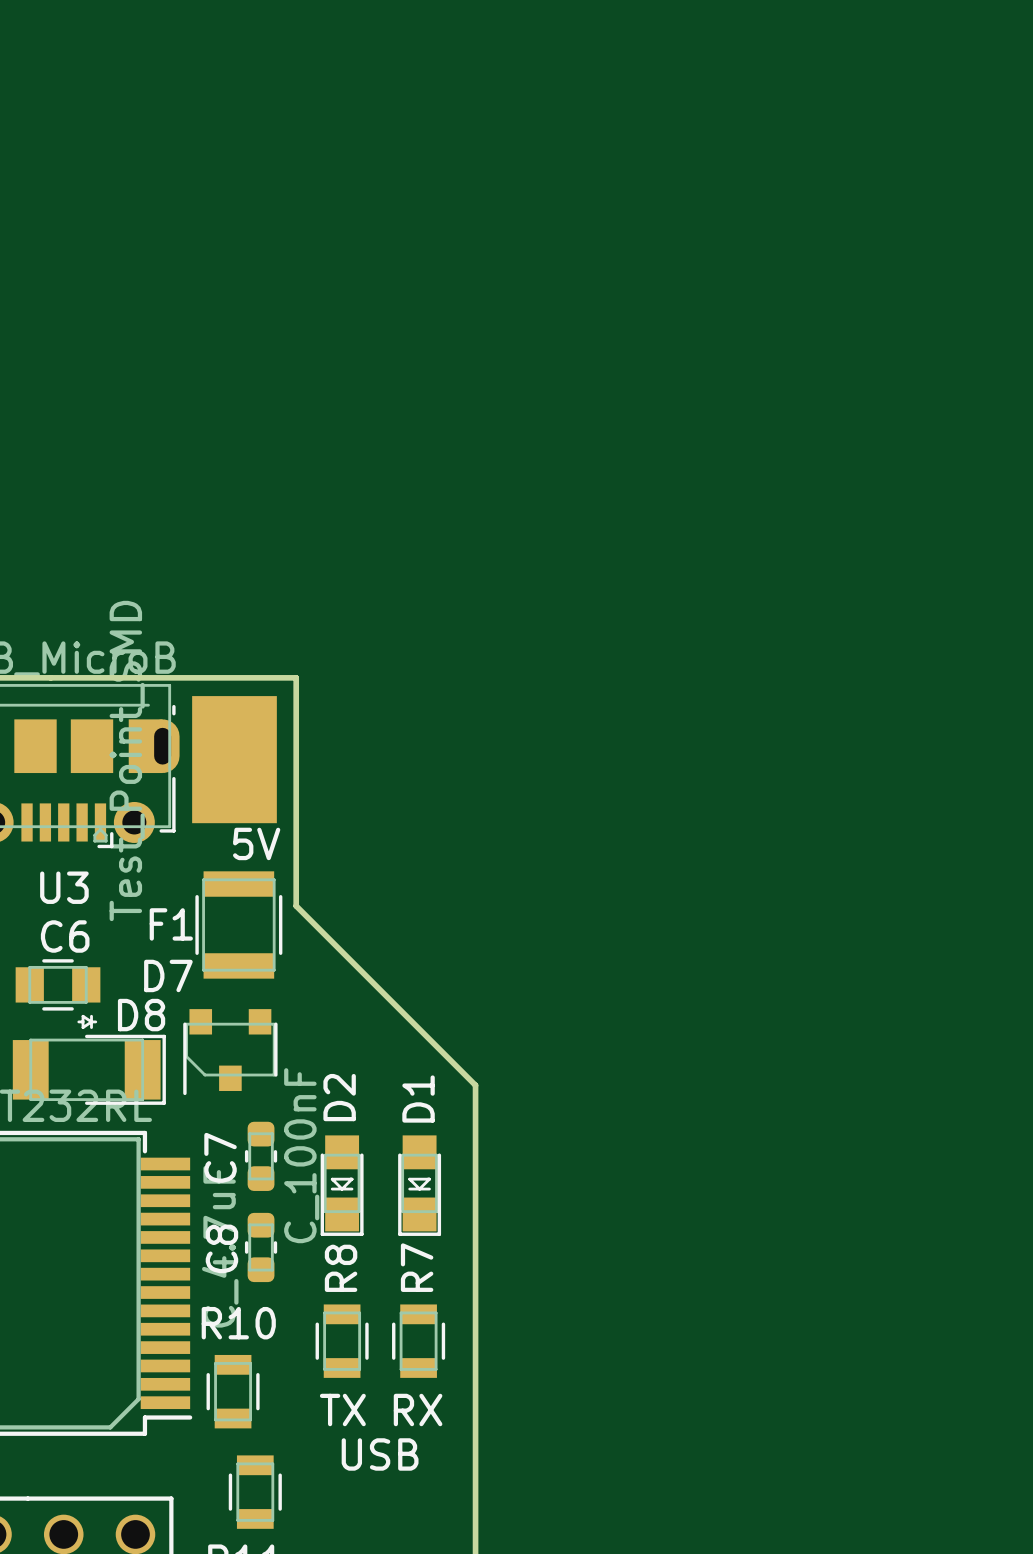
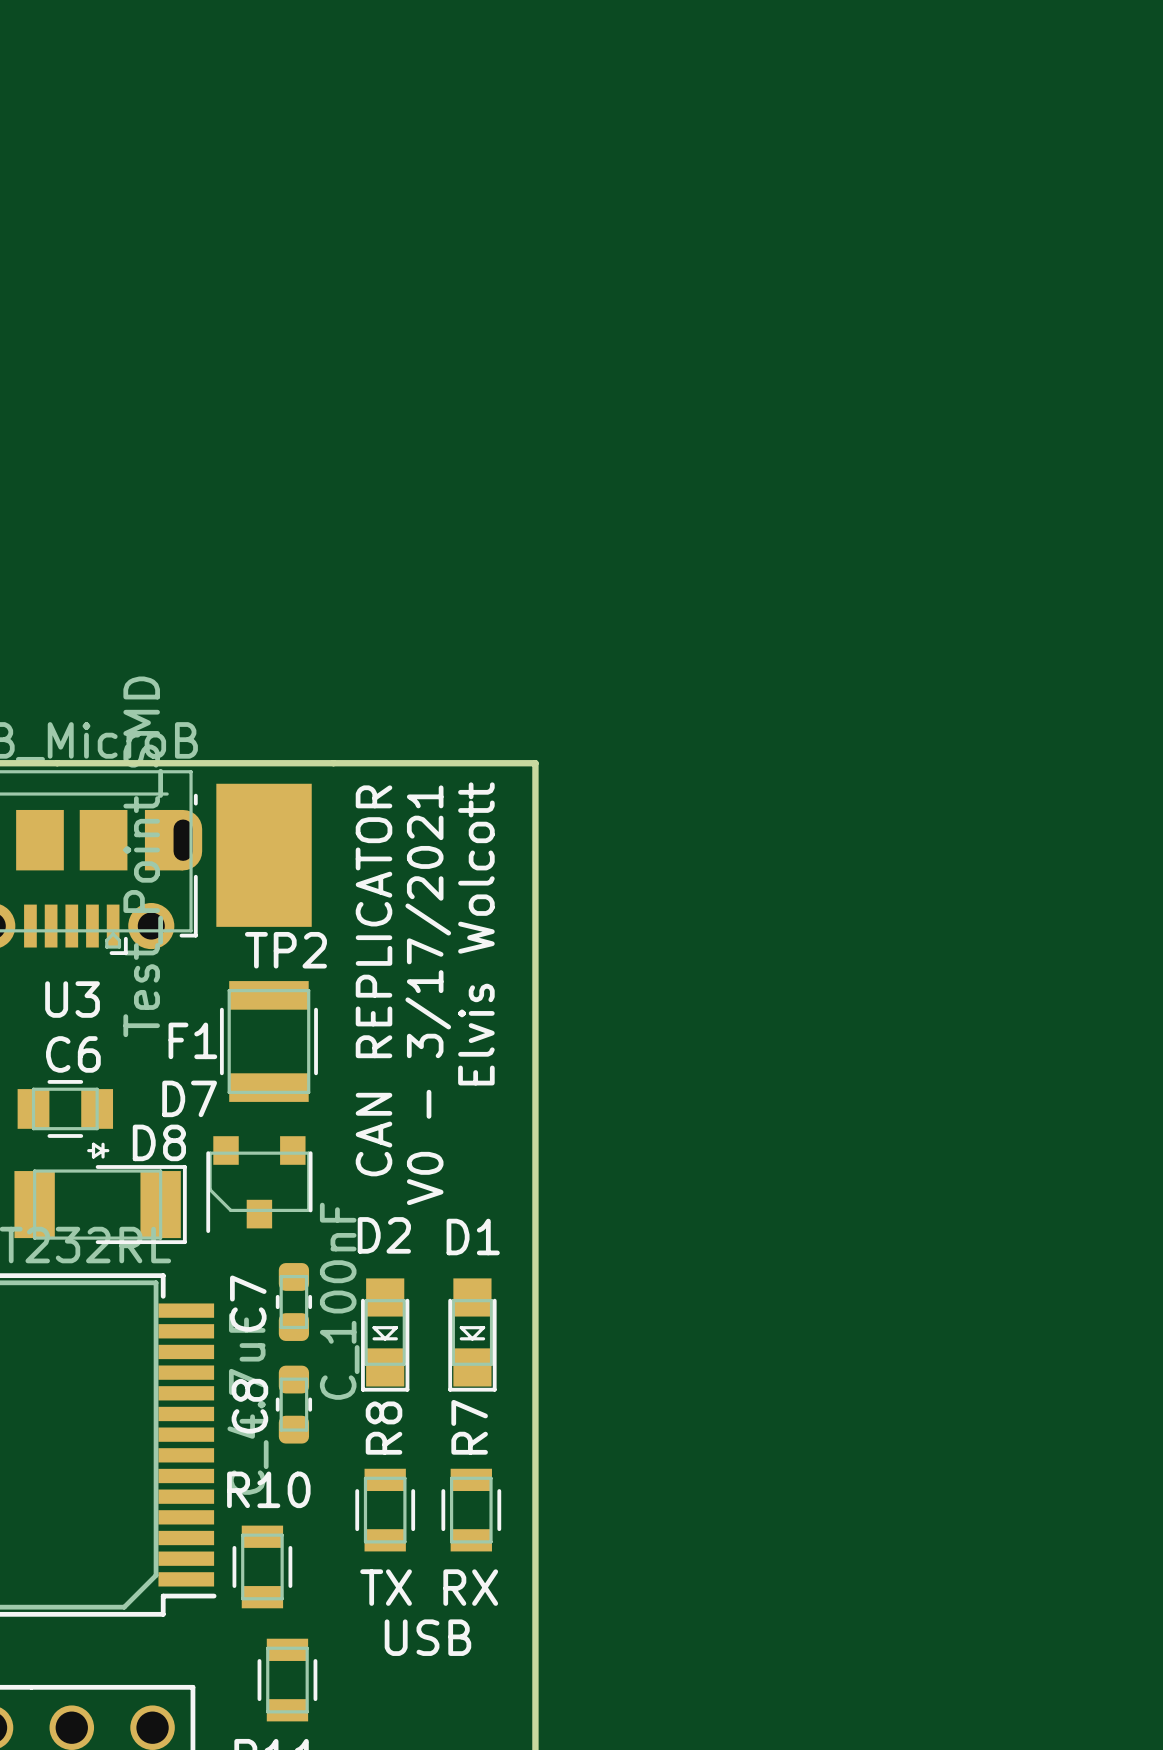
board edge: (296, 677) (296, 905) (475, 1085) -> (333, 763) (535, 763) (535, 1222)
text: none -> Elvis Wolcott (476, 933)
5V name: 5V (256, 843) -> TP2 (285, 950)
text: none -> CAN REPLICATOR (374, 980)
text: none -> V0 - 3/17/2021 (428, 995)
D2 name rotation: 0° (339, 1097) -> 90° clockwise (384, 1235)
D1 name rotation: 0° (418, 1099) -> 90° clockwise (473, 1237)

